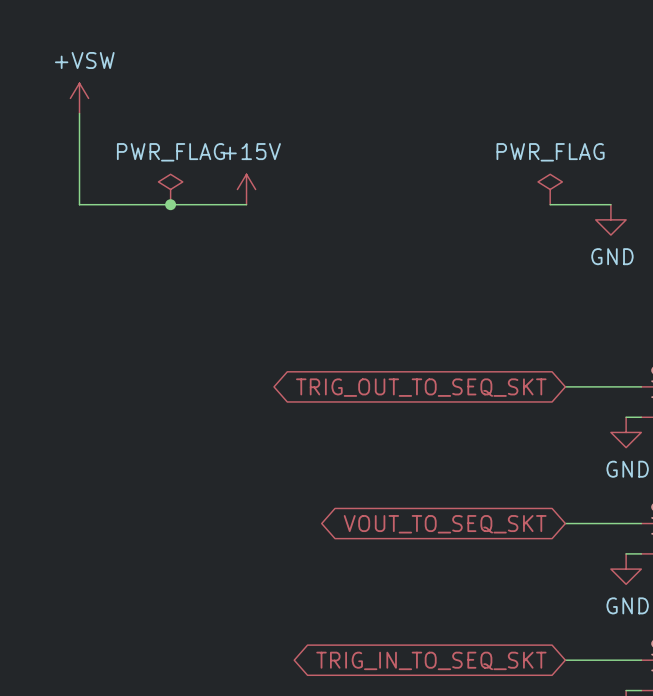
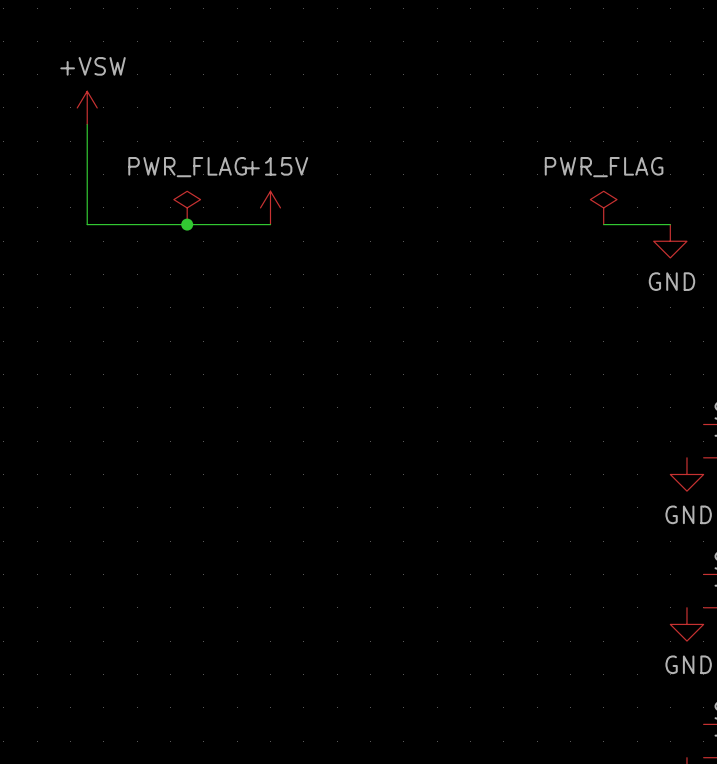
wire: (565, 386) (641, 386) -> none
global label: TRIG_OUT_TO_SEQ_SKT (421, 387) -> none
wire: (626, 417) (641, 417) -> none
wire: (565, 523) (641, 523) -> none
global label: VOUT_TO_SEQ_SKT (445, 524) -> none
wire: (626, 553) (641, 553) -> none
global label: TRIG_IN_TO_SEQ_SKT (431, 660) -> none
wire: (565, 660) (641, 660) -> none
wire: (626, 690) (641, 690) -> none

